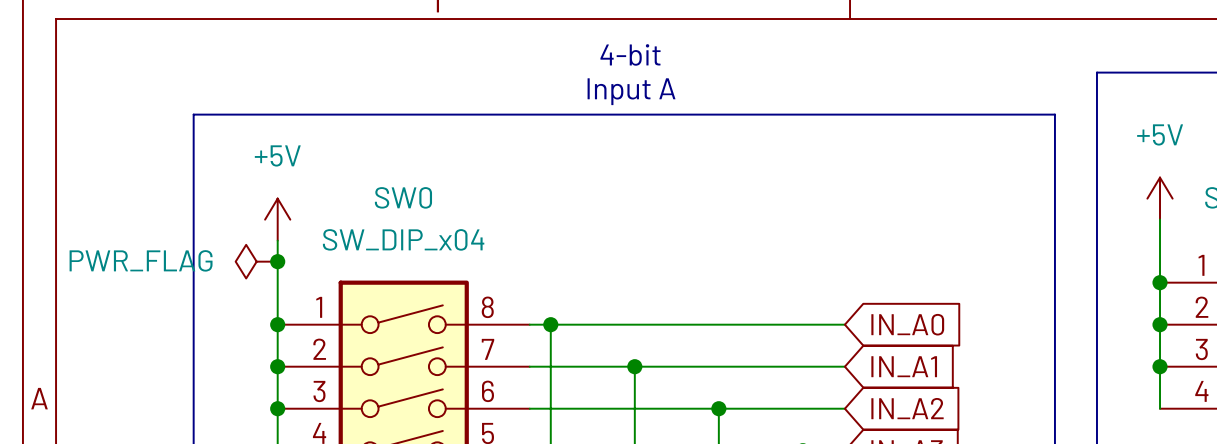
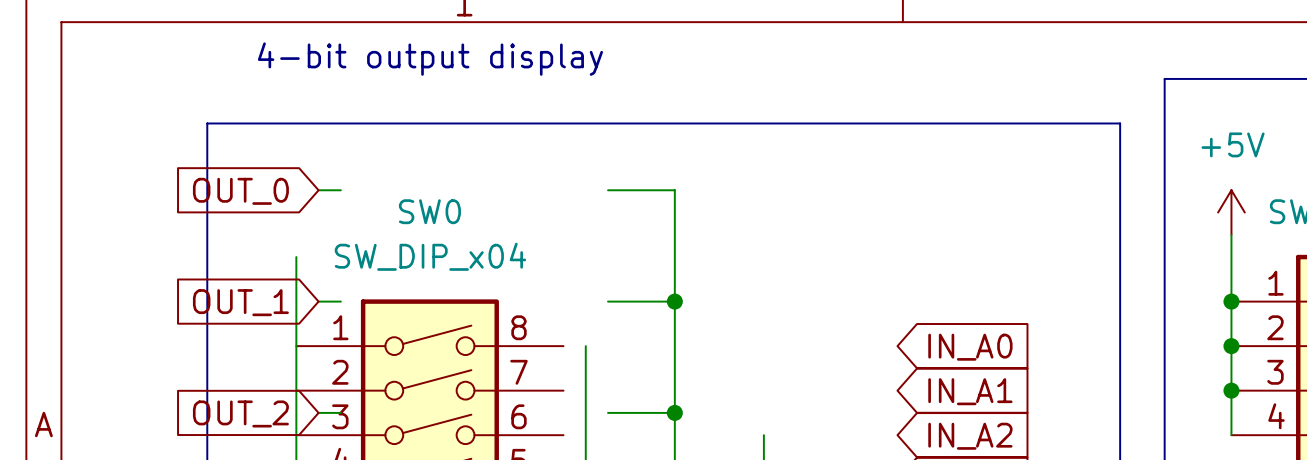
text: none -> 4-bit output display (430, 59)
text: 4-bit (630, 54) -> none
text: Input A (631, 91) -> none
global label: none -> OUT_0 (240, 191)
wire: none -> (318, 190) (340, 190)
wire: none -> (608, 190) (674, 190) (674, 390)
power symbol: +5V (277, 219) -> none
power symbol: PWR_FLAG (256, 261) -> none
junction: (277, 261) -> none
global label: none -> OUT_1 (240, 302)
wire: none -> (318, 301) (340, 301)
wire: none -> (608, 301) (674, 301)
junction: none -> (674, 301)
junction: (277, 324) -> none
wire: (529, 324) (844, 324) -> none
junction: (550, 324) -> none
junction: (277, 366) -> none
wire: (529, 366) (844, 366) -> none
junction position: (634, 366) -> (674, 412)
global label: none -> OUT_2 (240, 413)
wire: none -> (318, 412) (340, 412)
wire: none -> (608, 412) (674, 412)
junction: (277, 408) -> none
wire: (529, 408) (844, 408) -> none
junction: (718, 408) -> none

